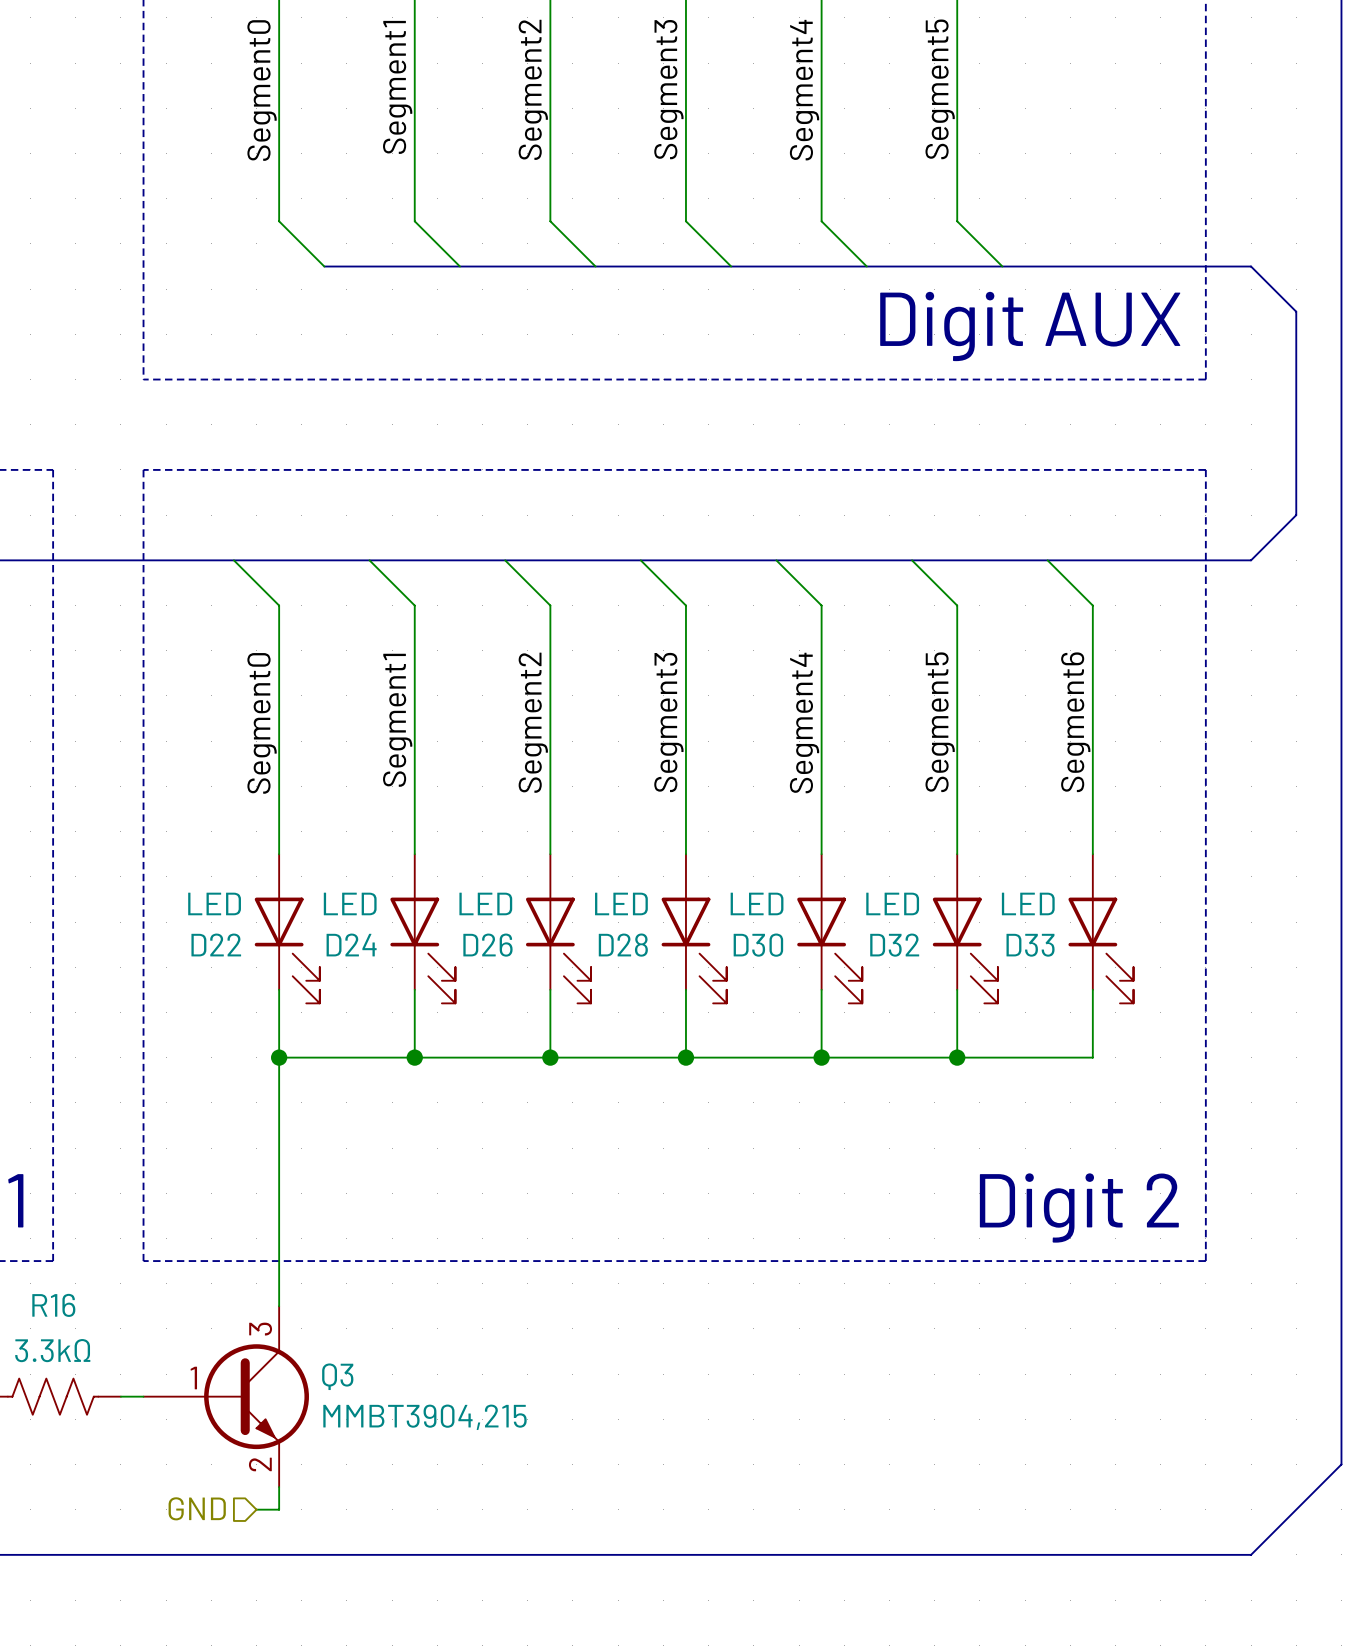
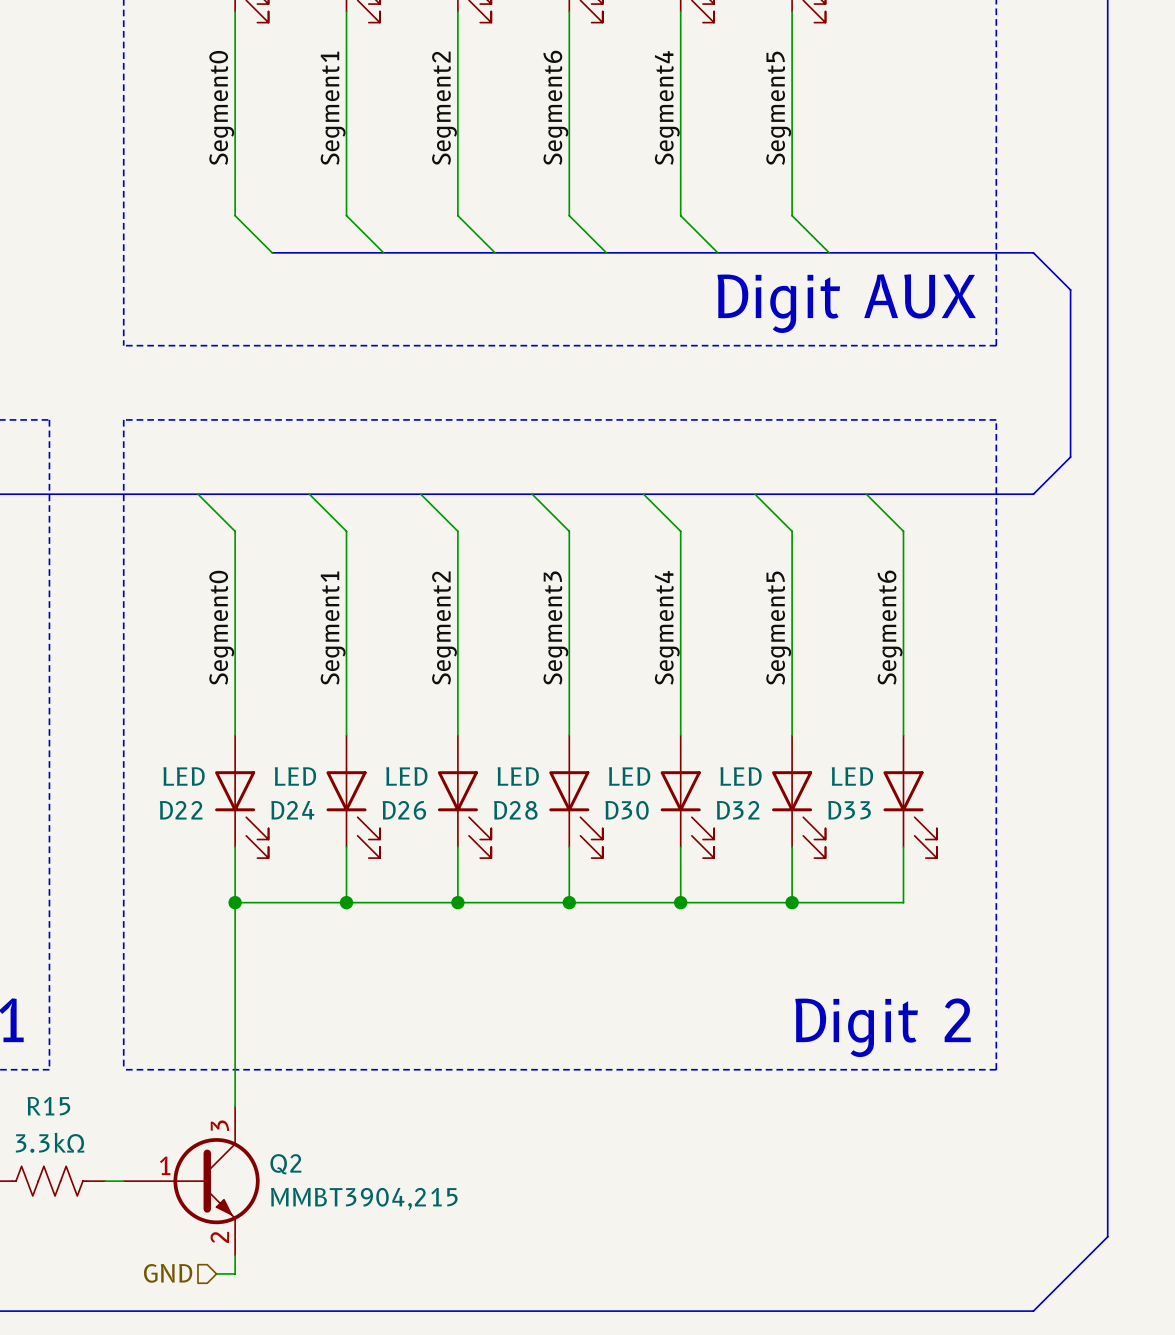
label: Segment3 (668, 89) -> Segment6 (555, 107)
R16 name: R16 (53, 1305) -> R15 (48, 1106)
Q3 name: Q3 (337, 1376) -> Q2 (285, 1164)

